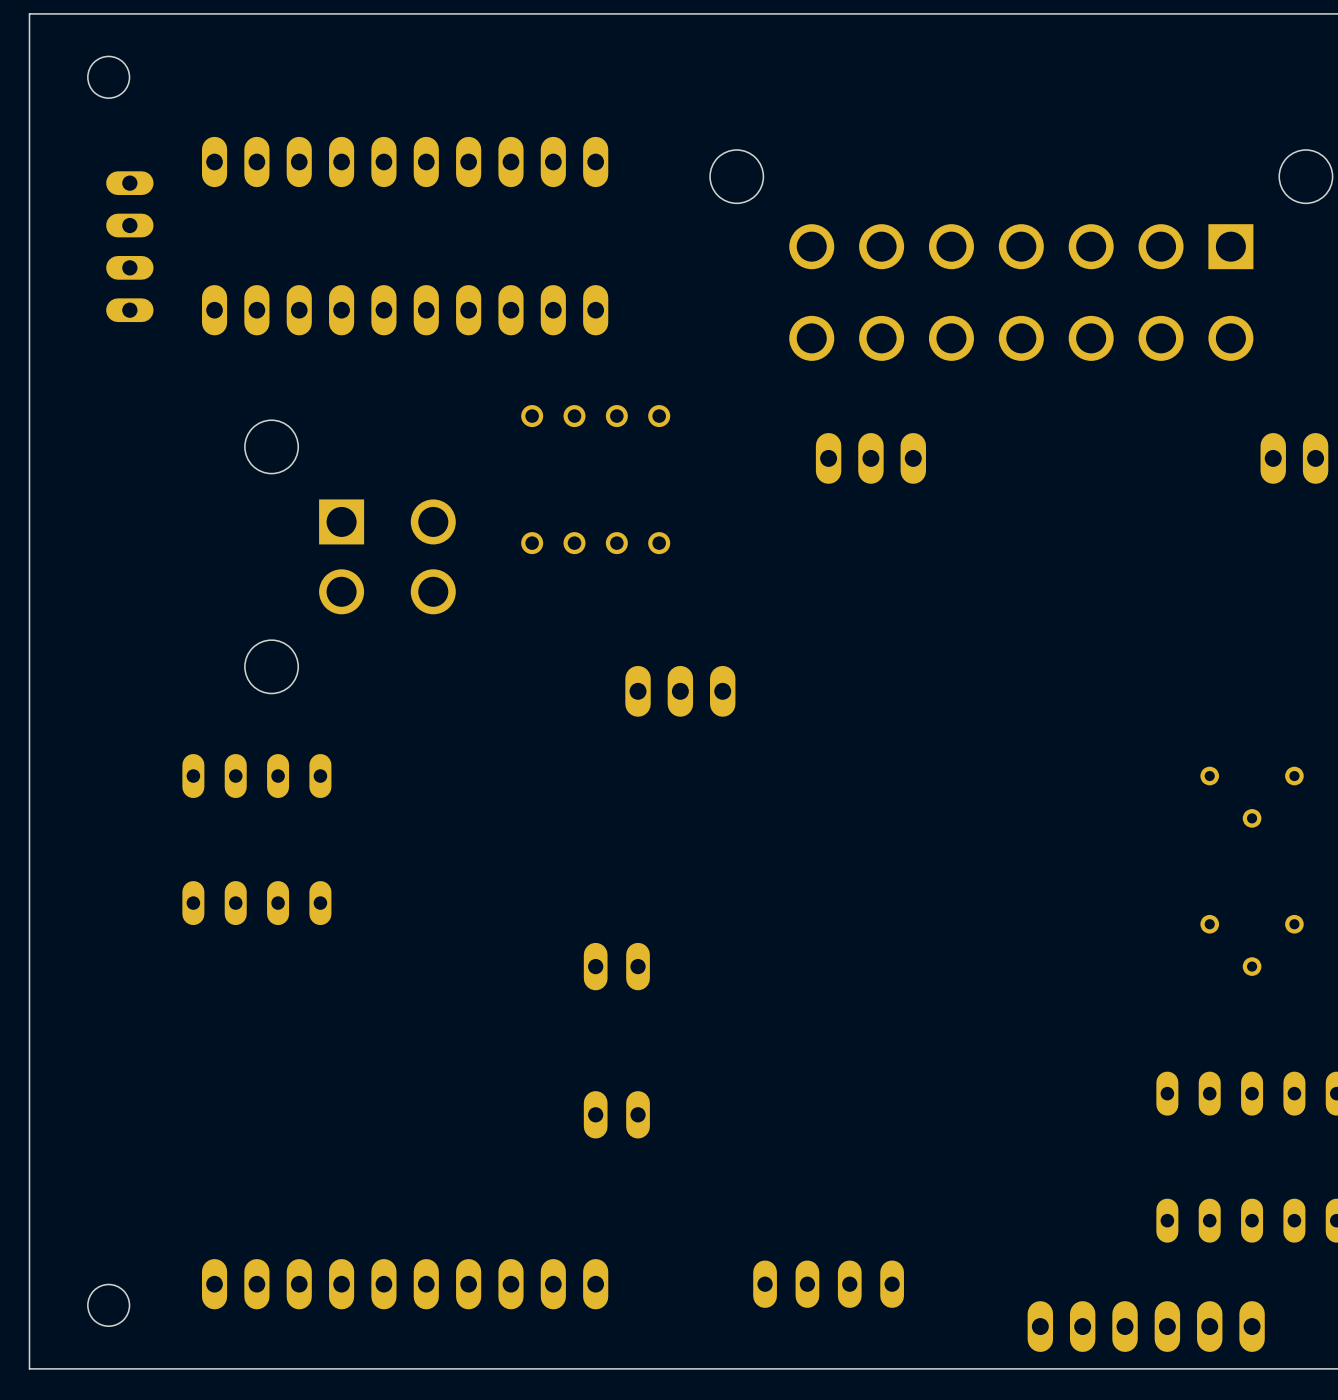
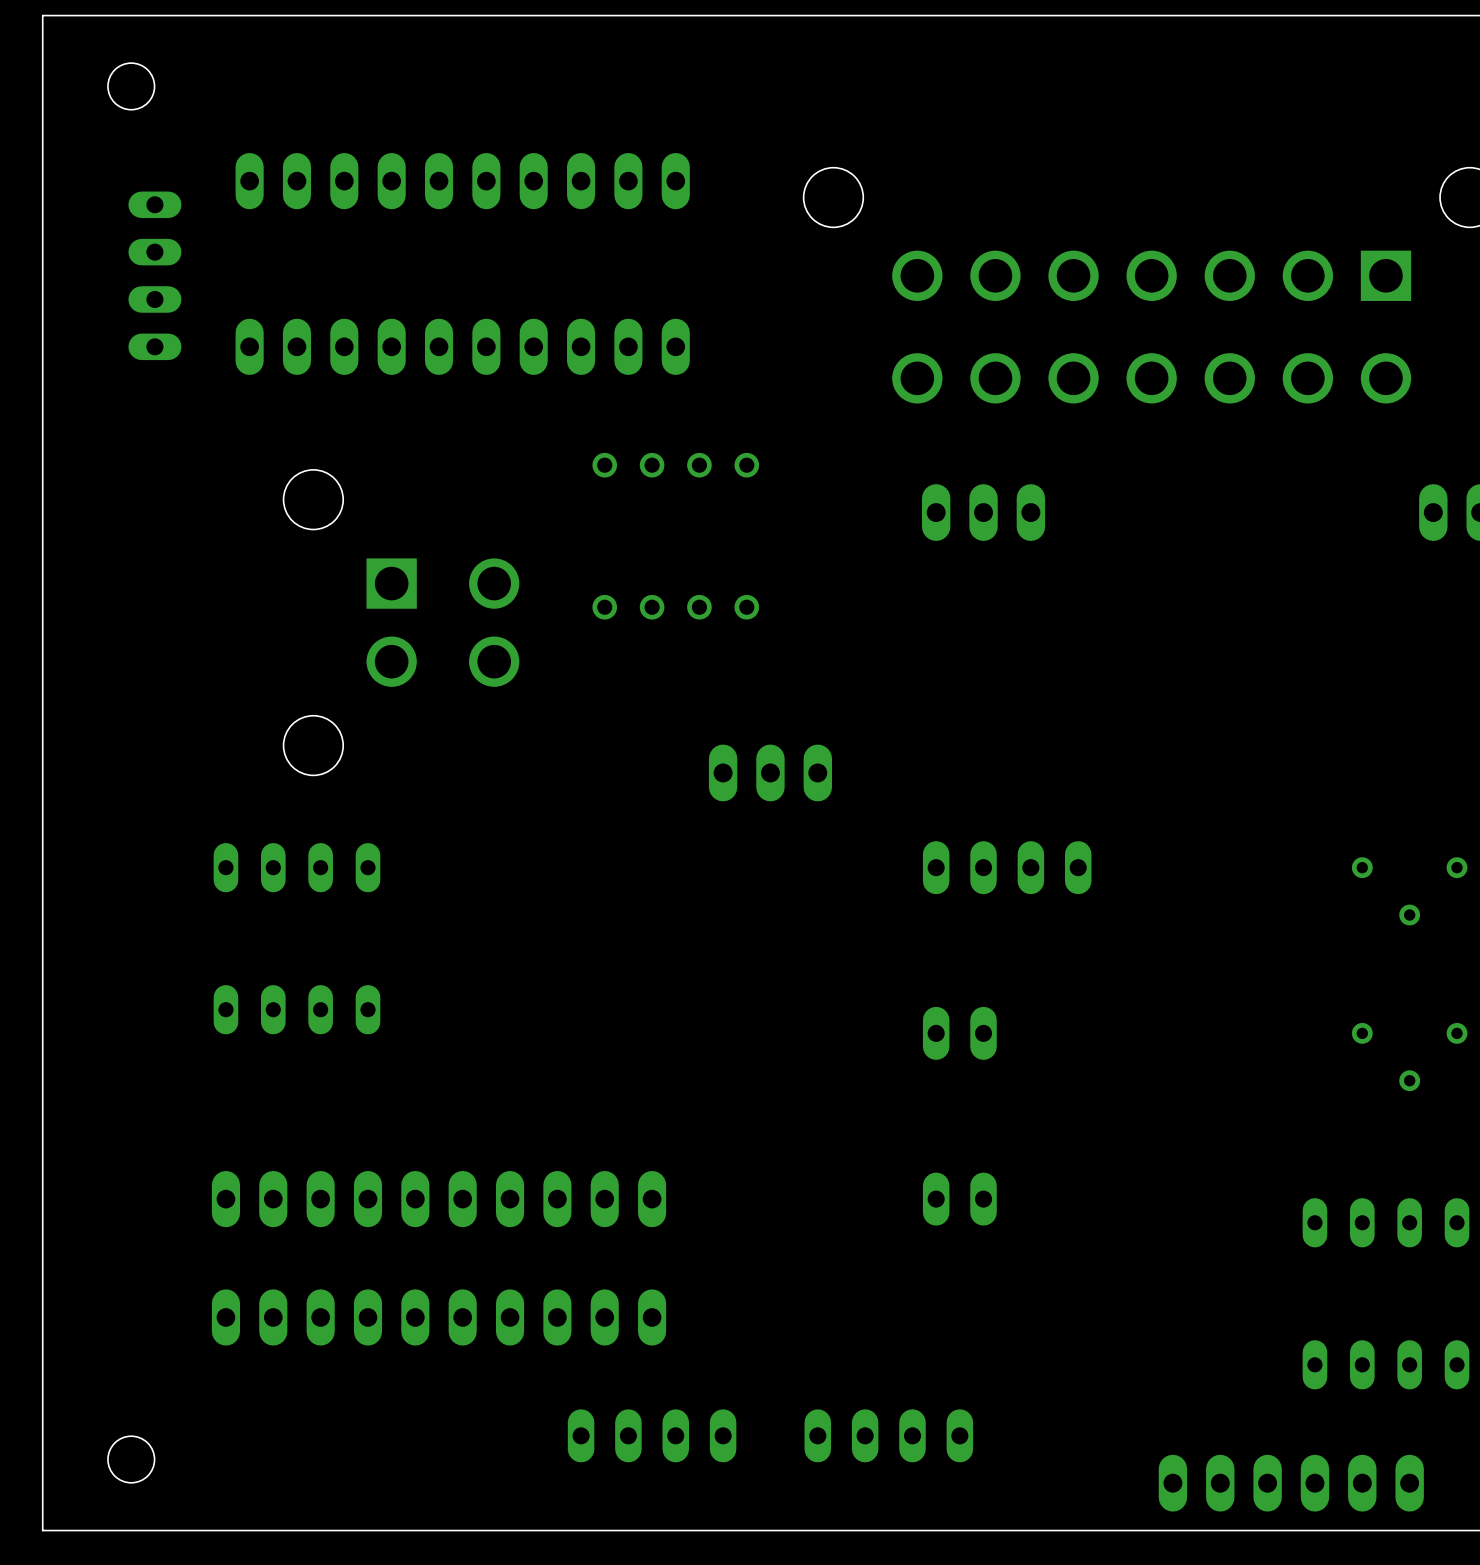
part: none -> (1007, 867)
part: none -> (959, 1033)
part: (616, 966) -> none
part: none -> (439, 1199)
part: none -> (959, 1199)
part: (616, 1114) -> none
part: none -> (439, 1317)
part: (405, 1284) -> none
part: none -> (652, 1435)
part position: (828, 1284) -> (888, 1435)

